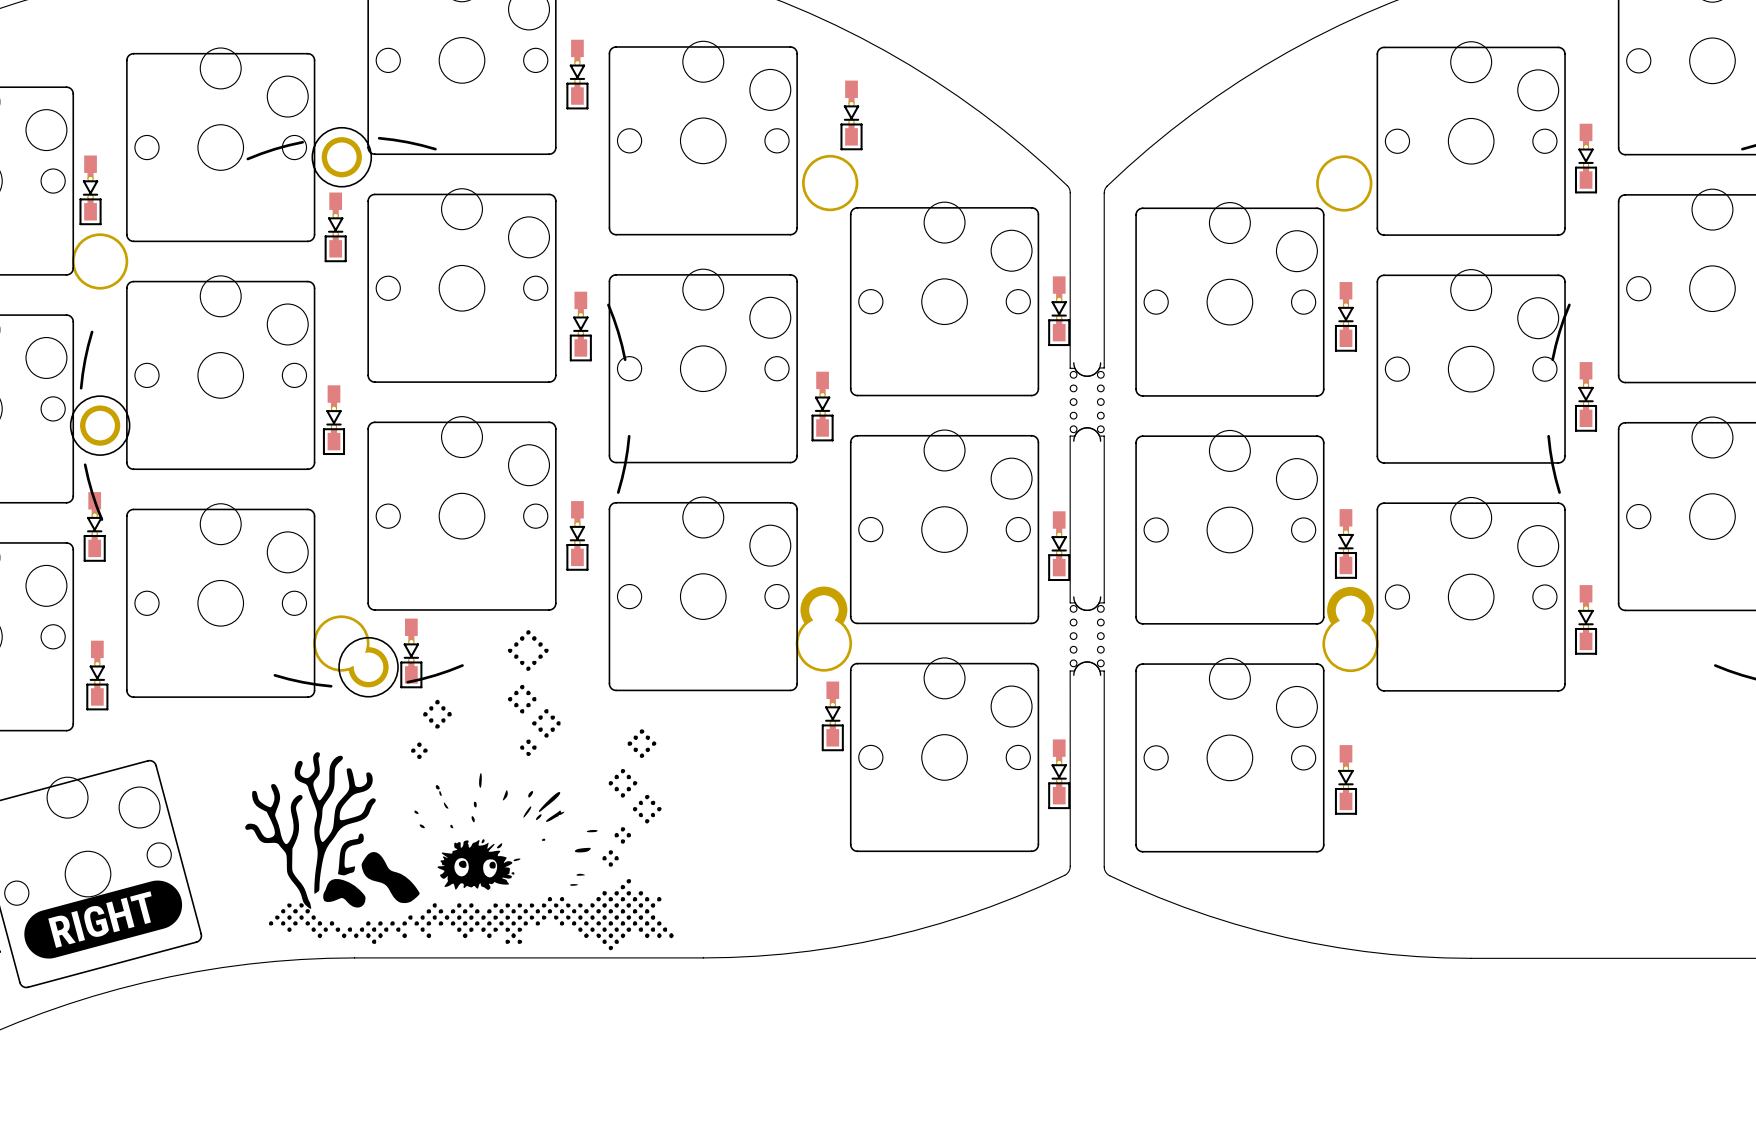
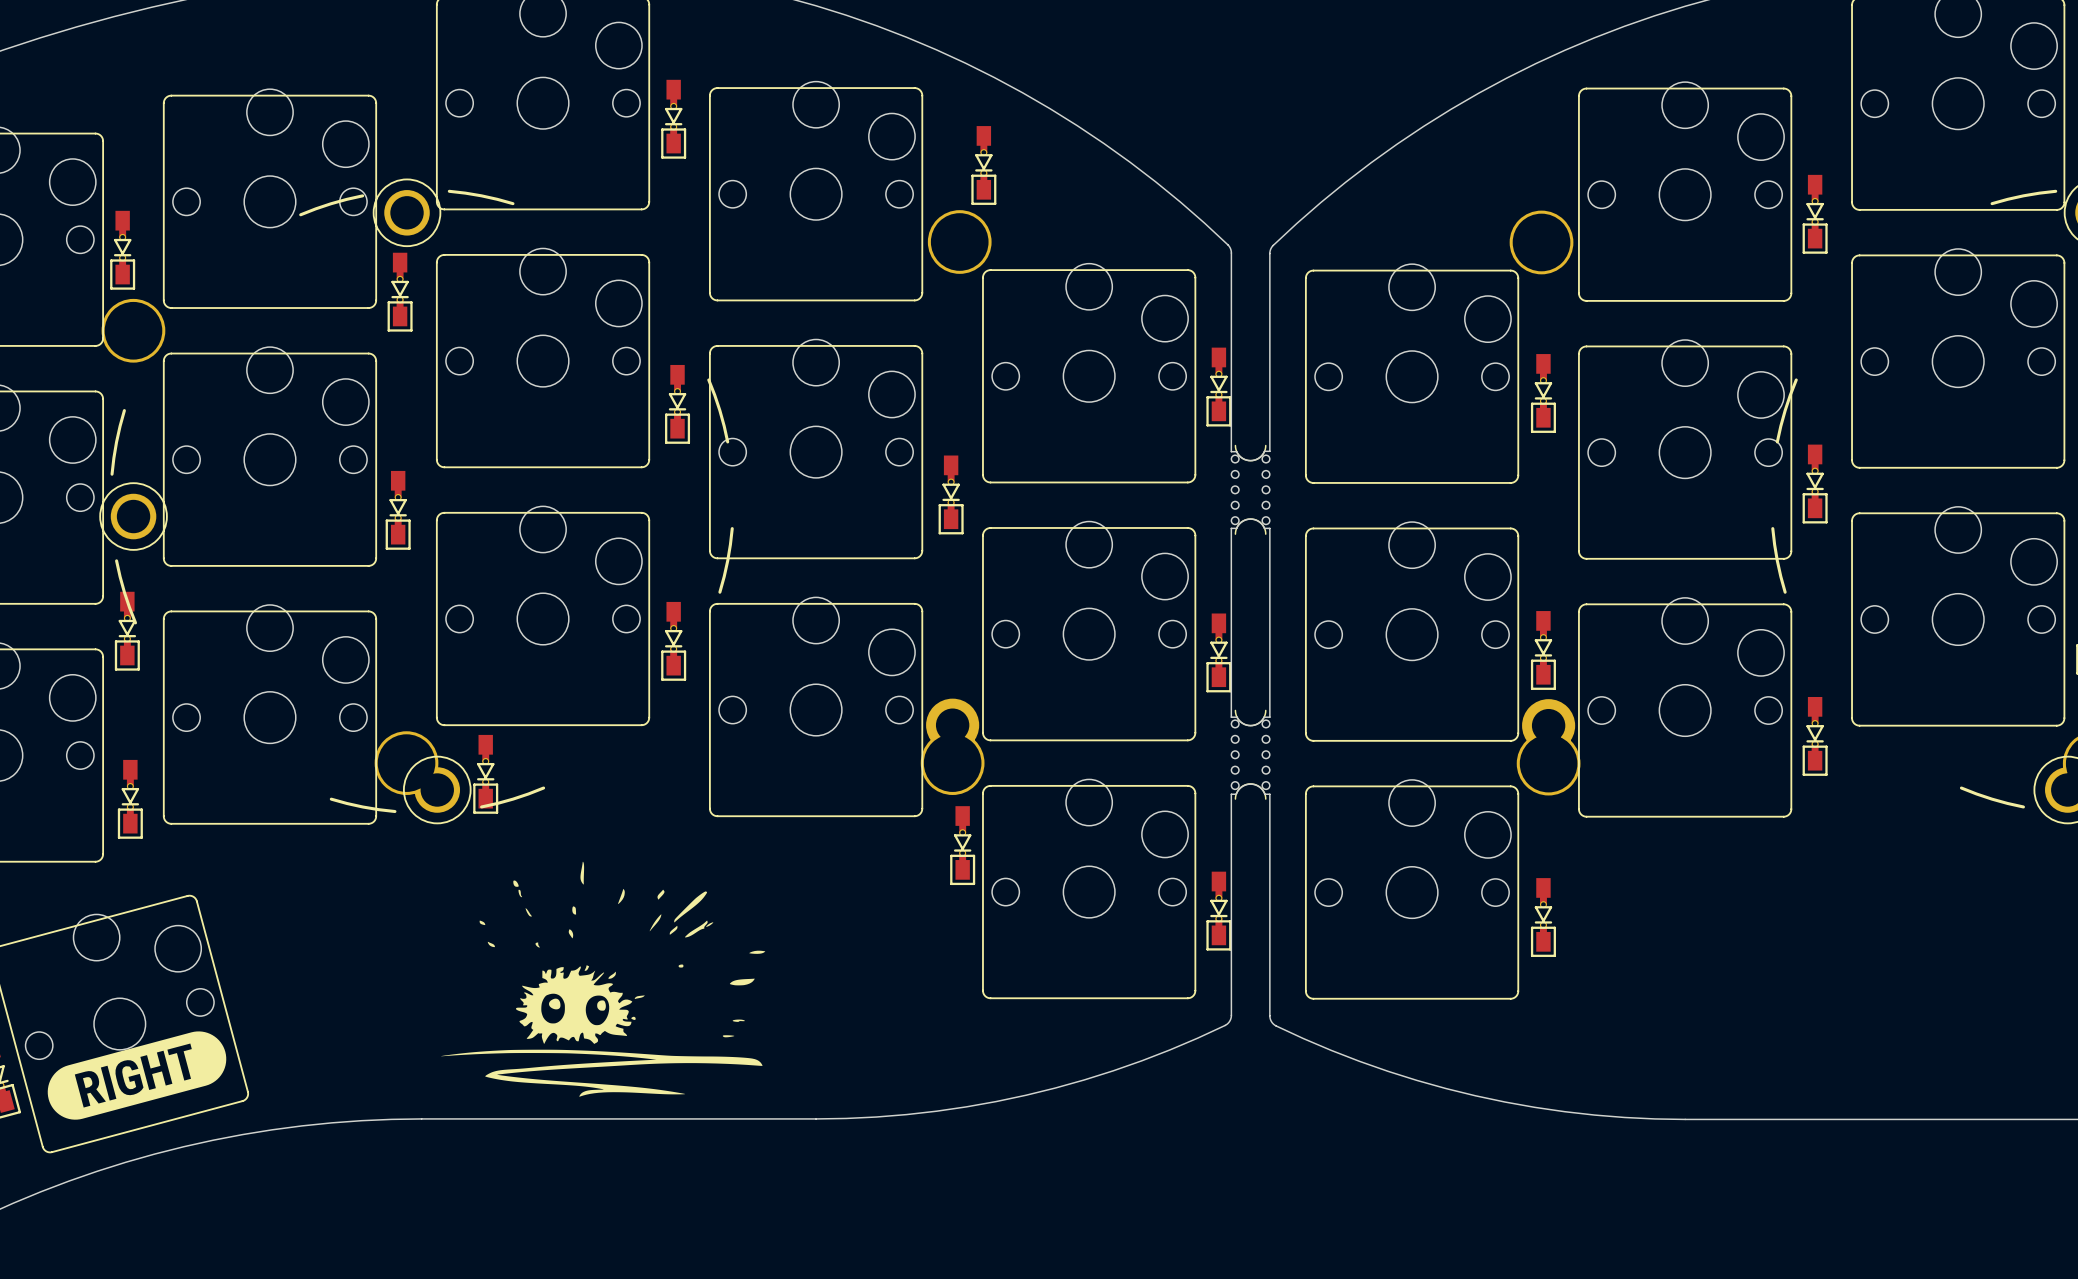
drawing: [245, 630, 674, 951] -> none
drawing: none -> [441, 861, 766, 1097]

